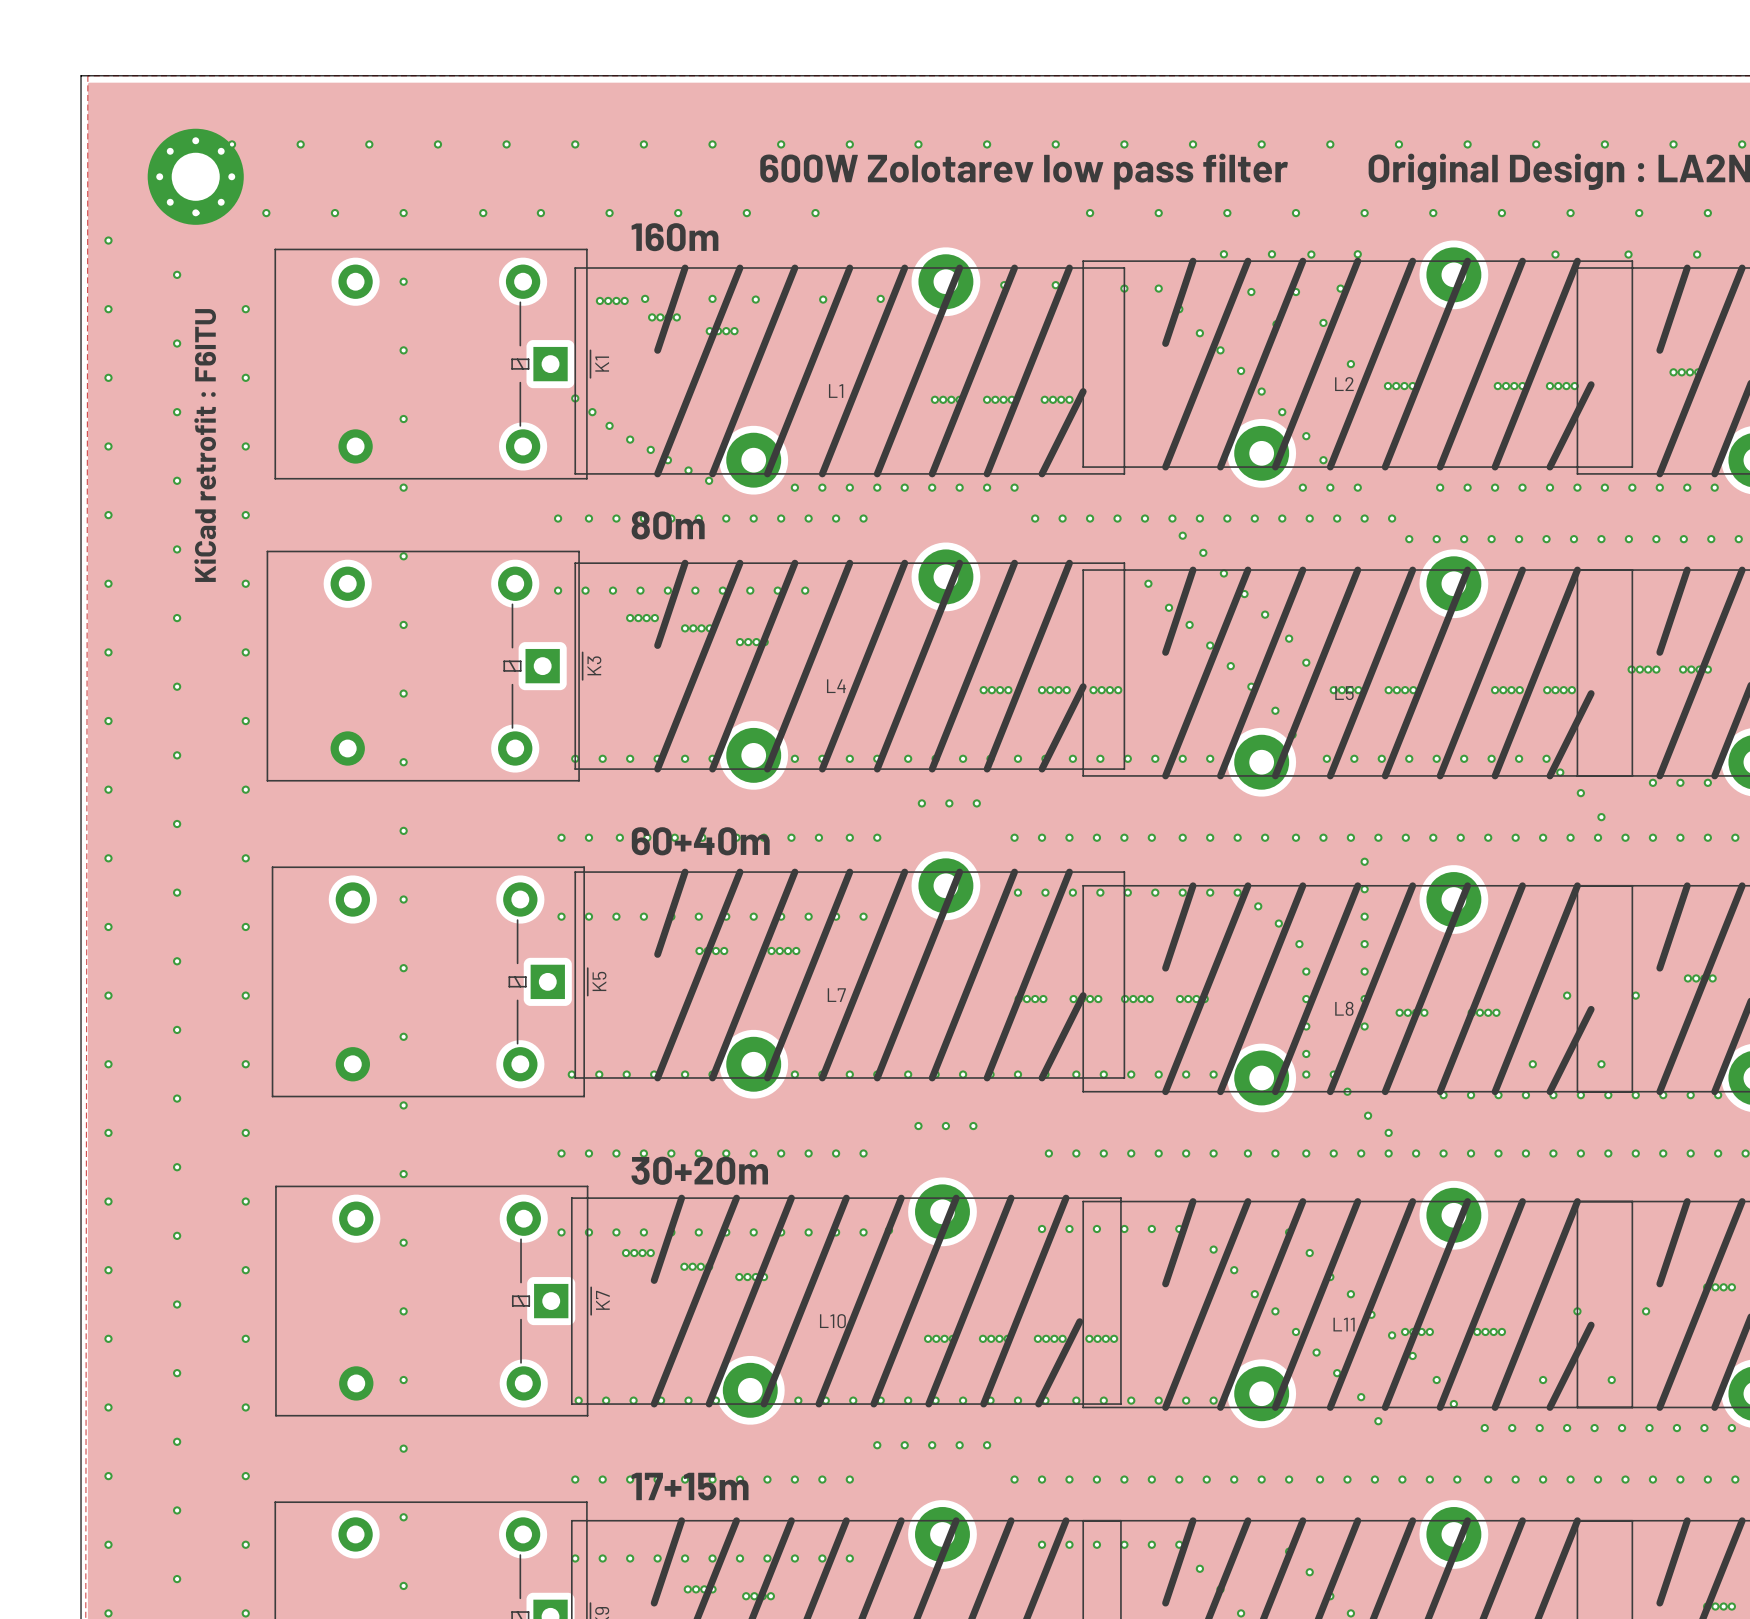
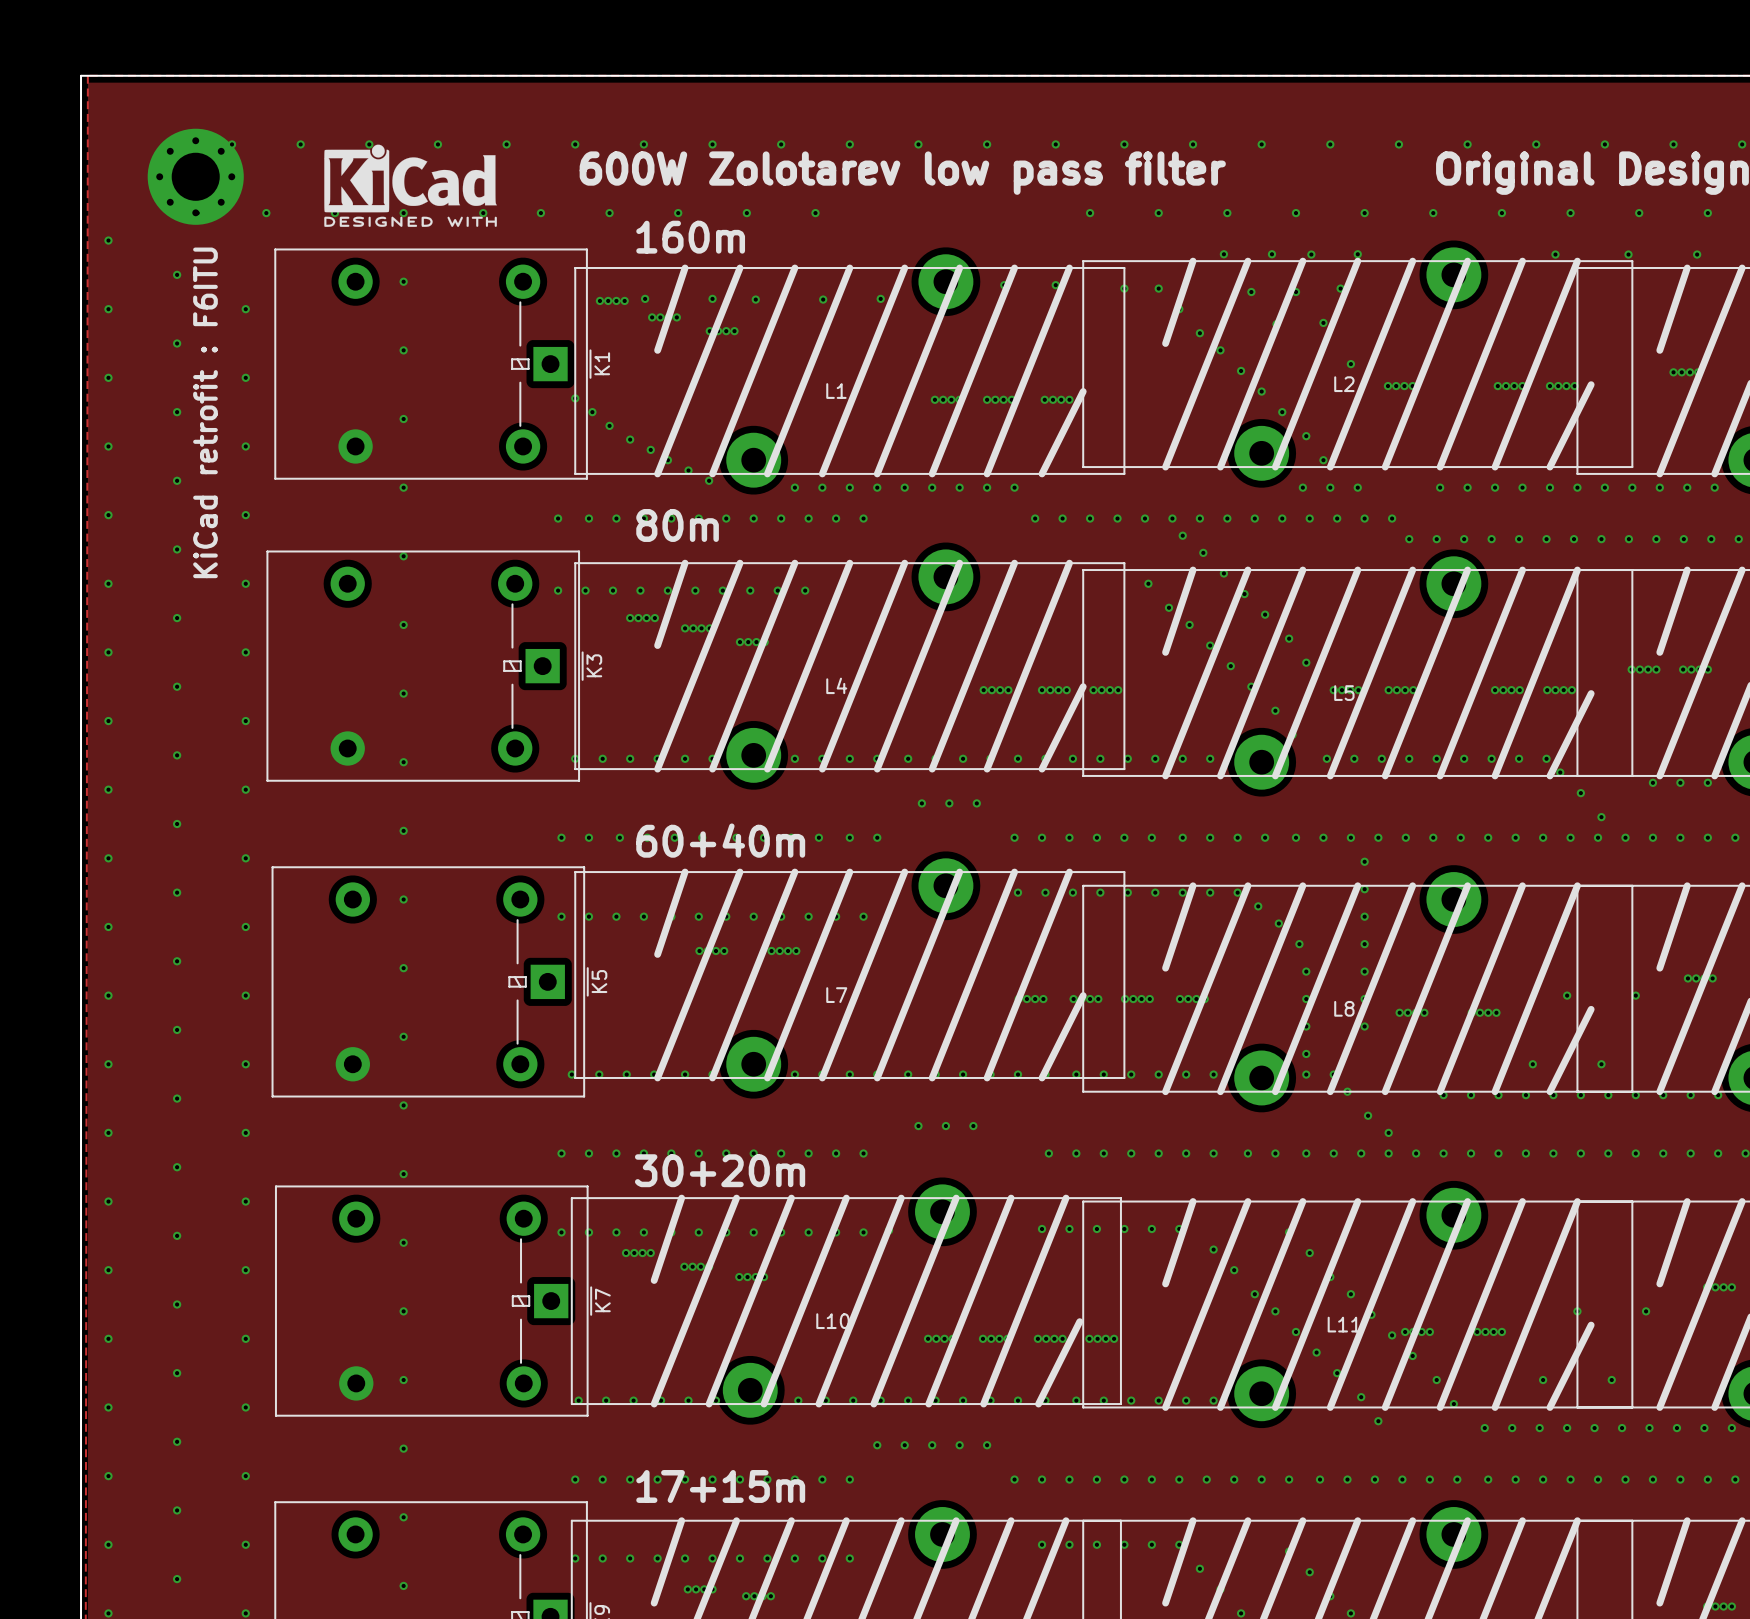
drawing: none -> [324, 144, 497, 227]

